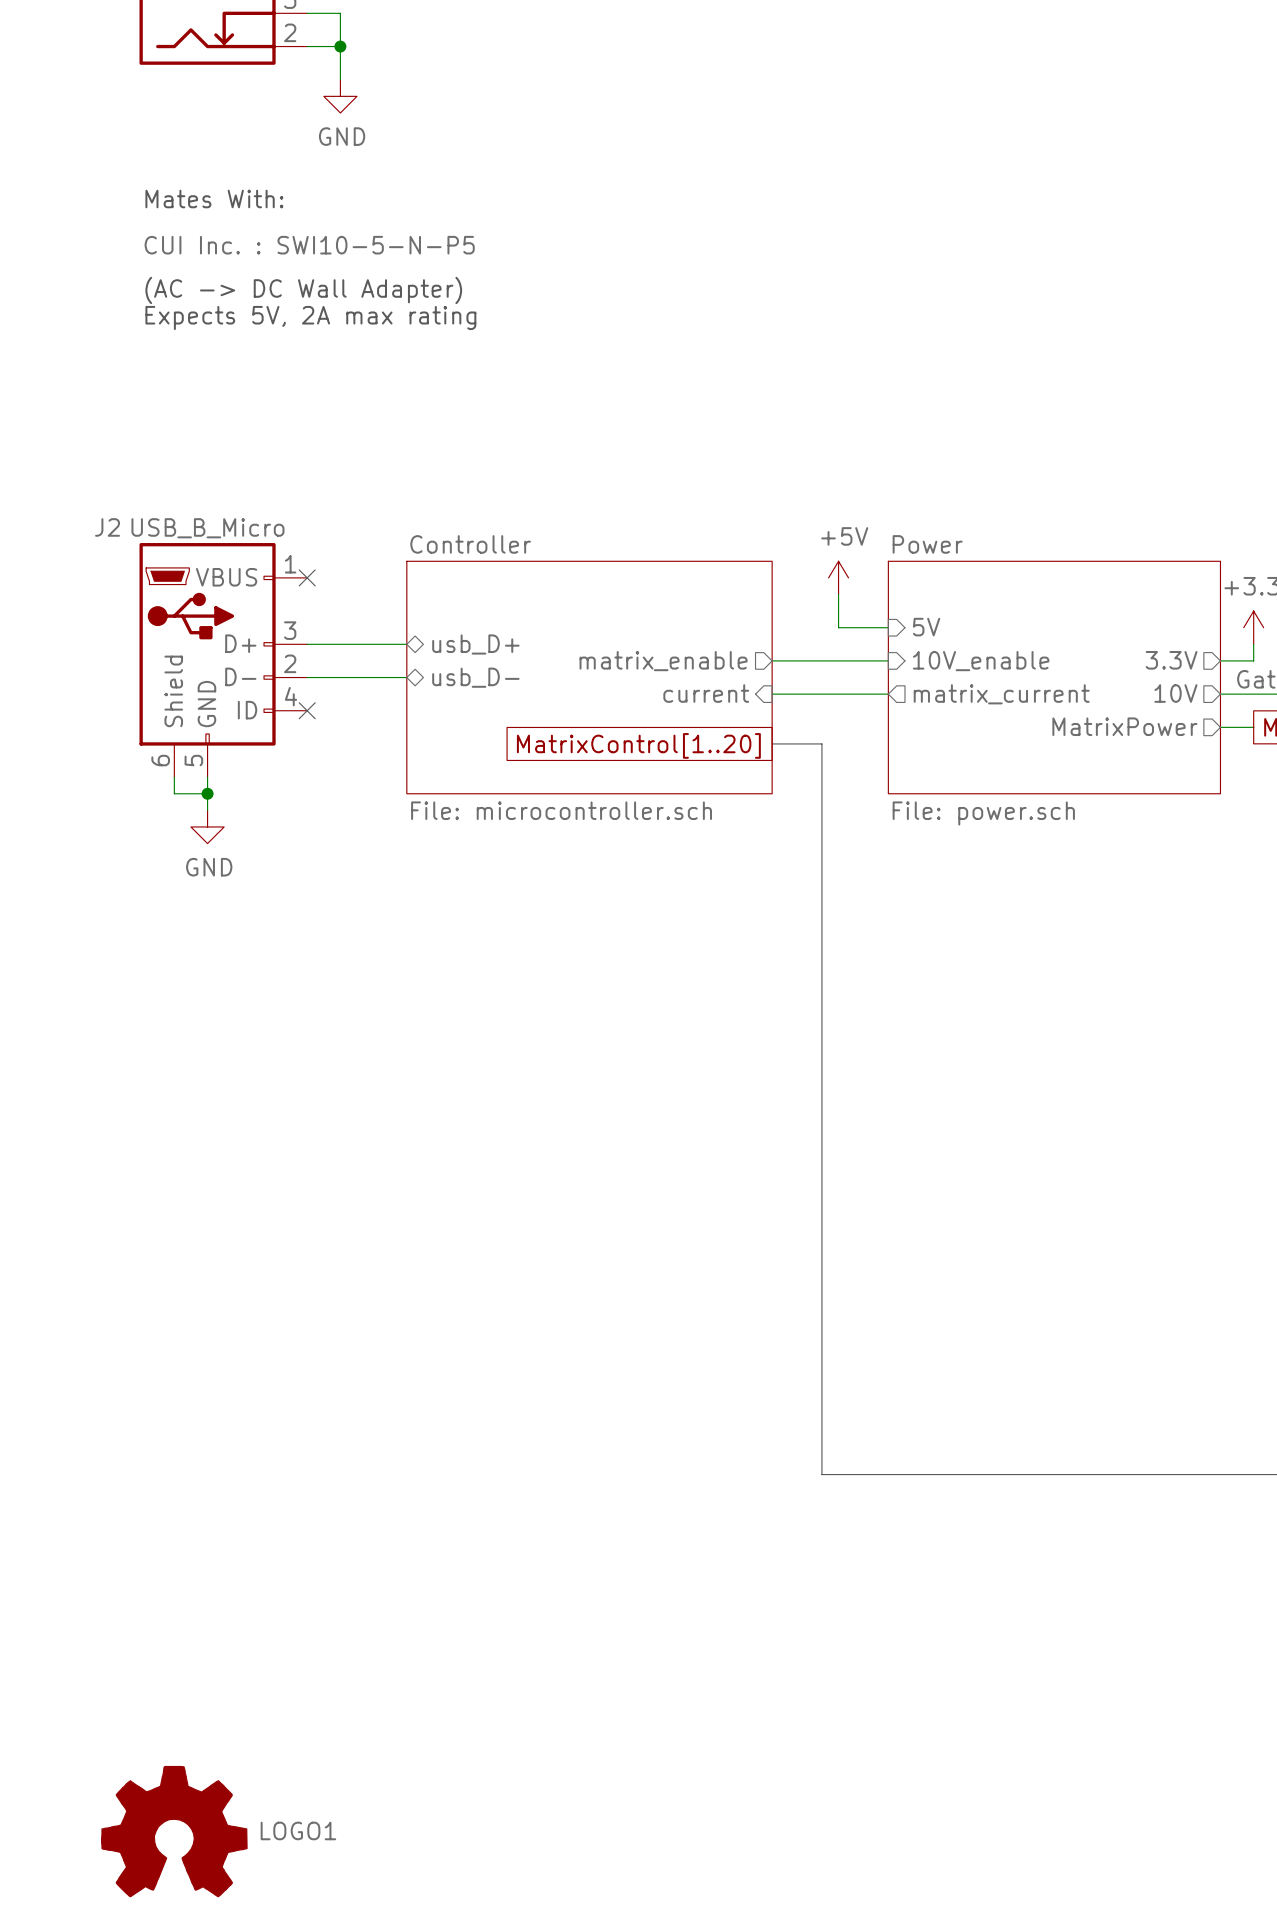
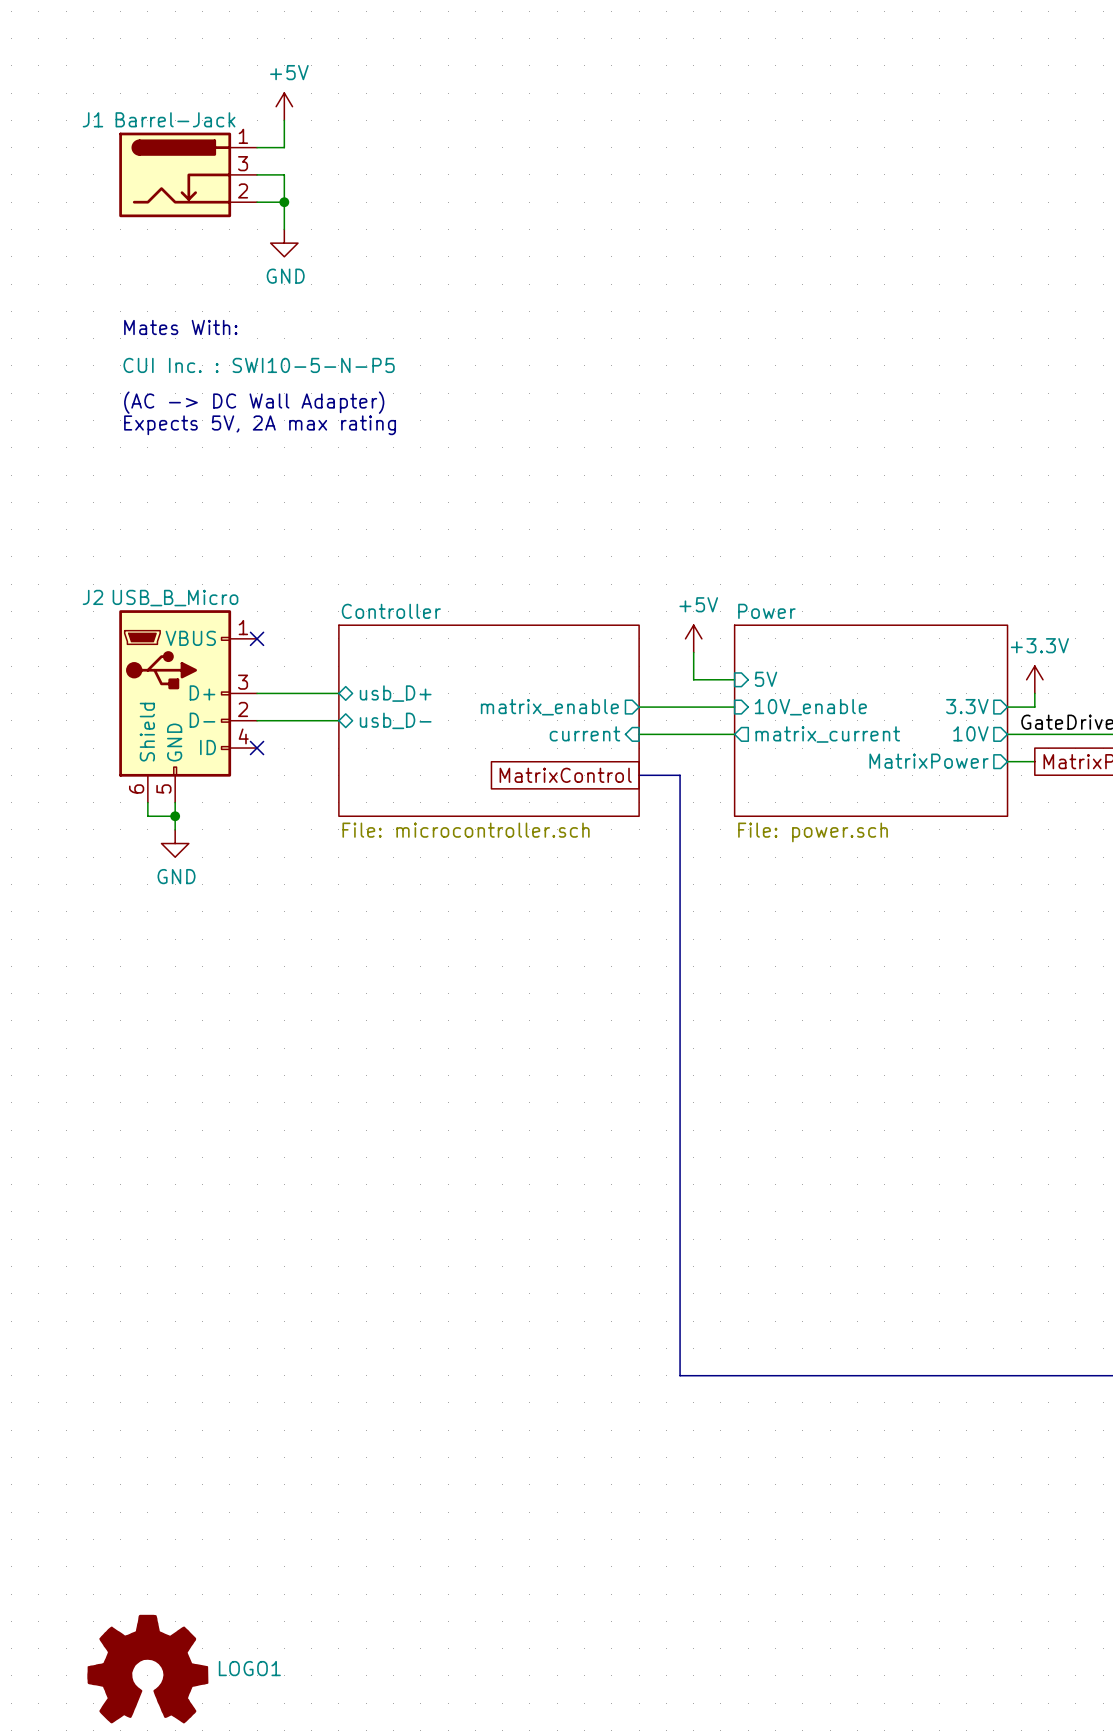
global label: MatrixControl[1..20] (638, 745) -> MatrixControl (565, 775)

